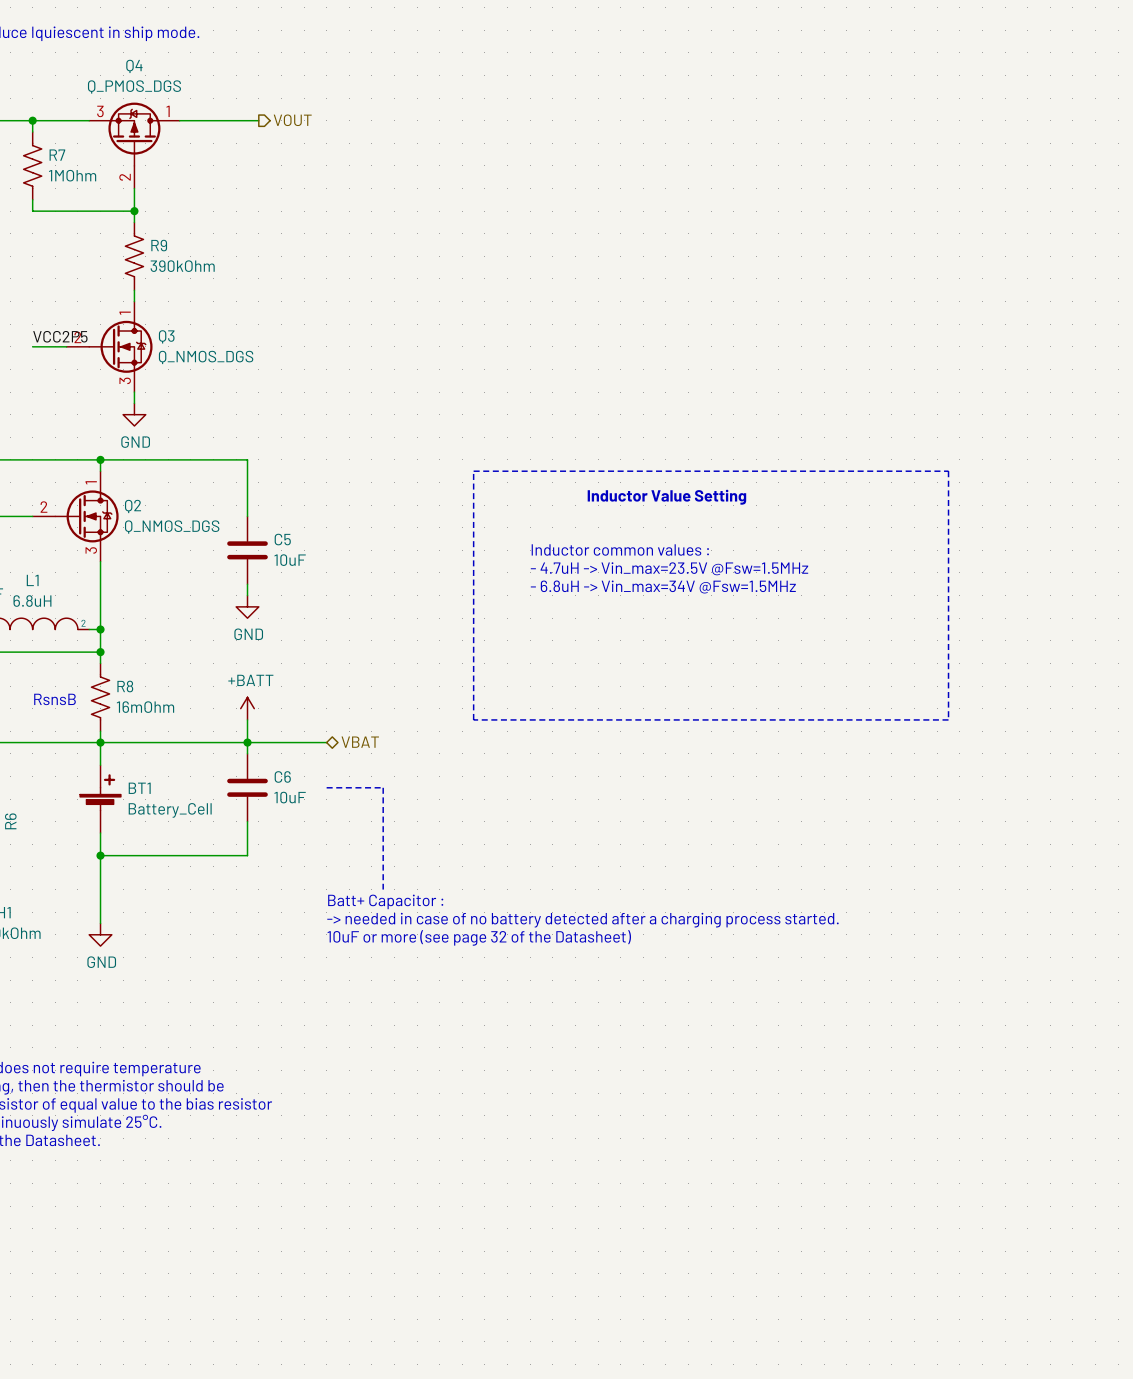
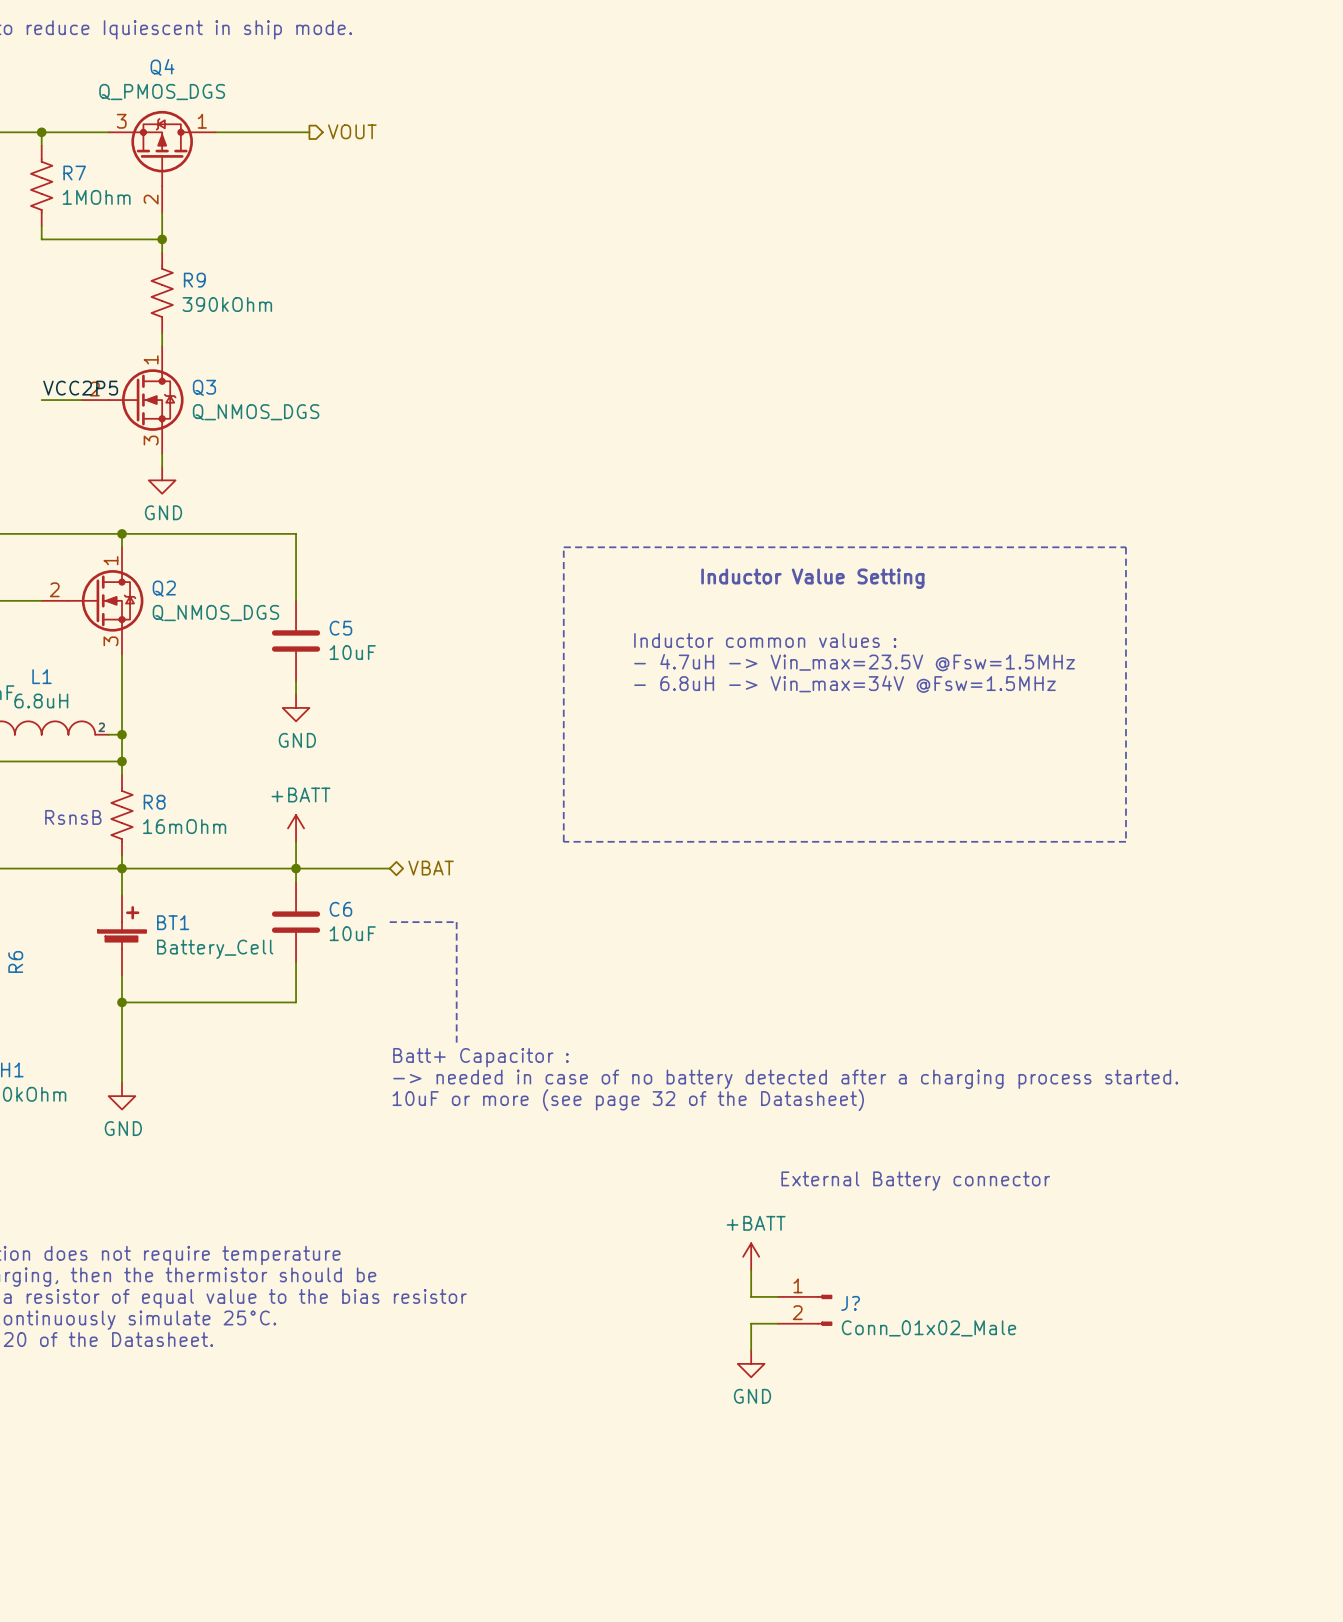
text: none -> External Battery connector (915, 1181)
power symbol: none -> +BATT (751, 1256)
wire: none -> (751, 1270) (751, 1296) (777, 1296)
J?: none -> Conn_01x02_Male (805, 1310)
wire: none -> (777, 1323) (751, 1323) (751, 1350)
power symbol: none -> GND (751, 1363)

